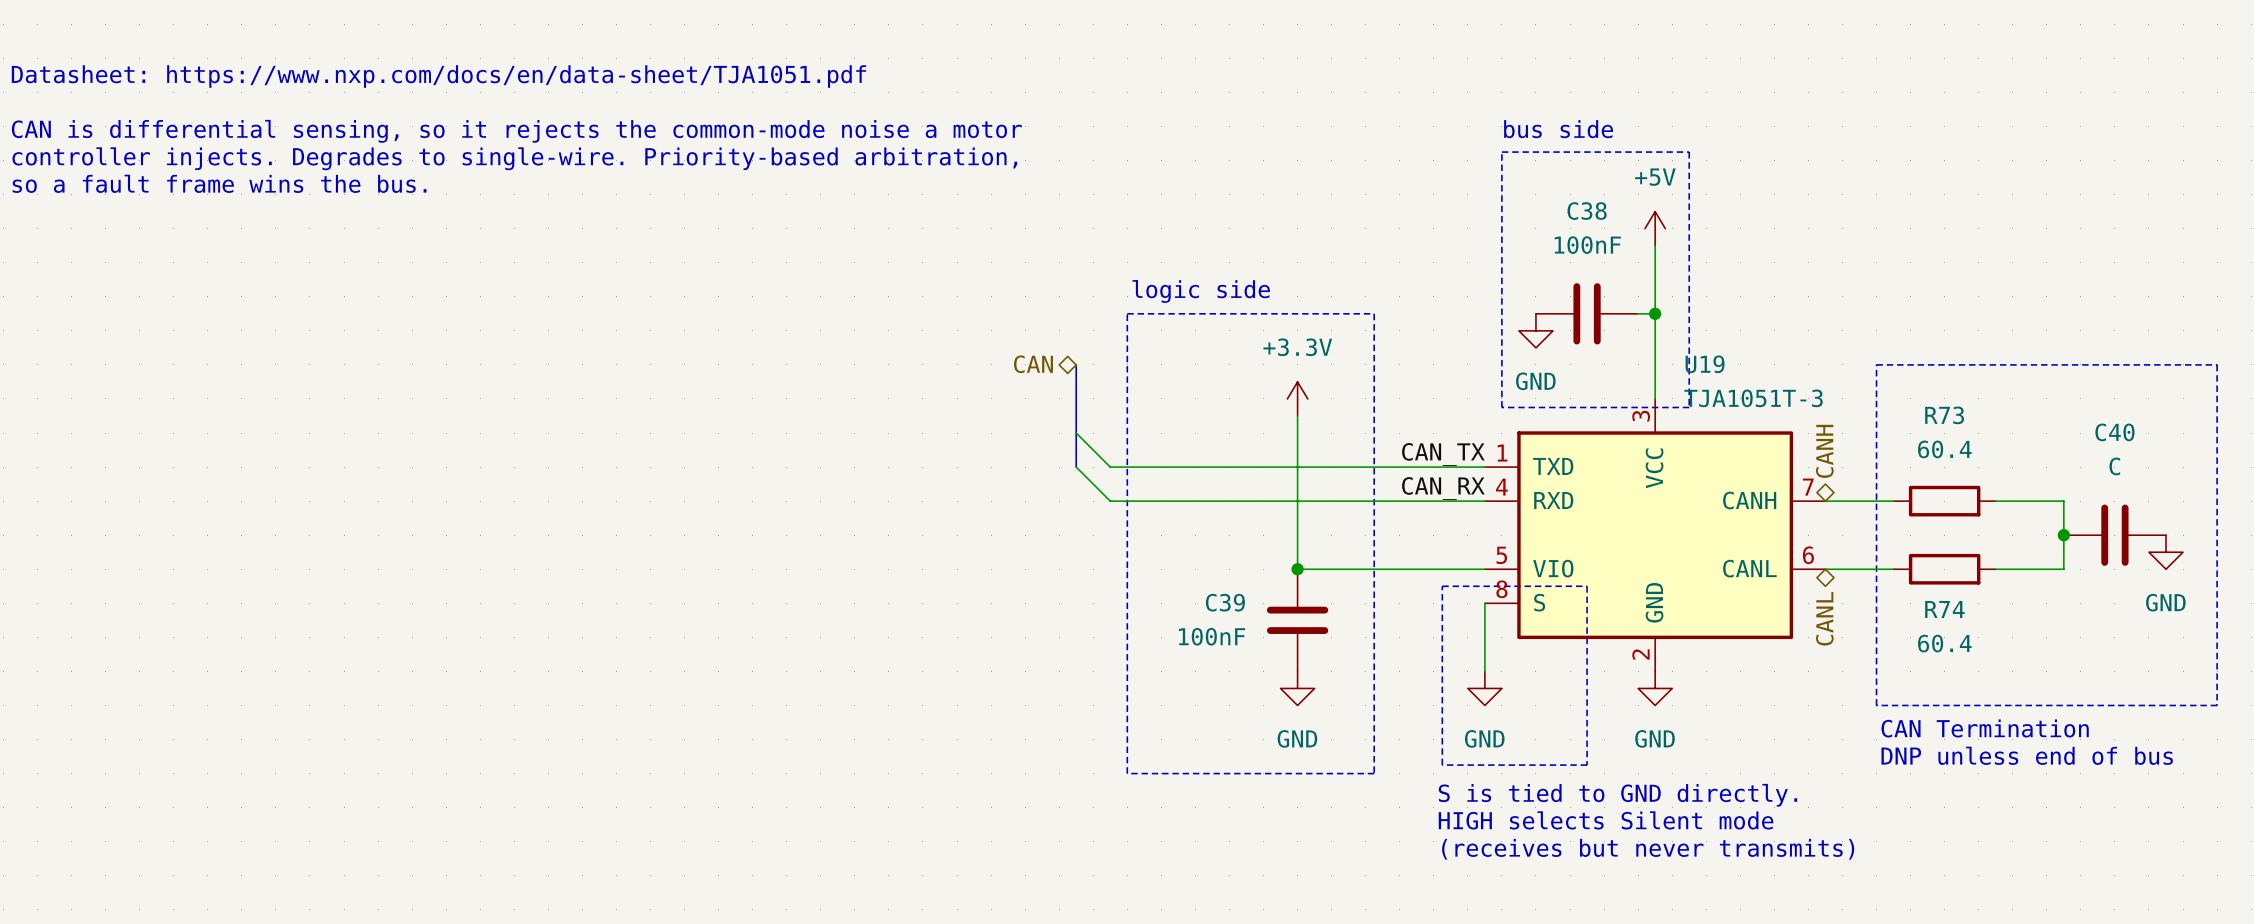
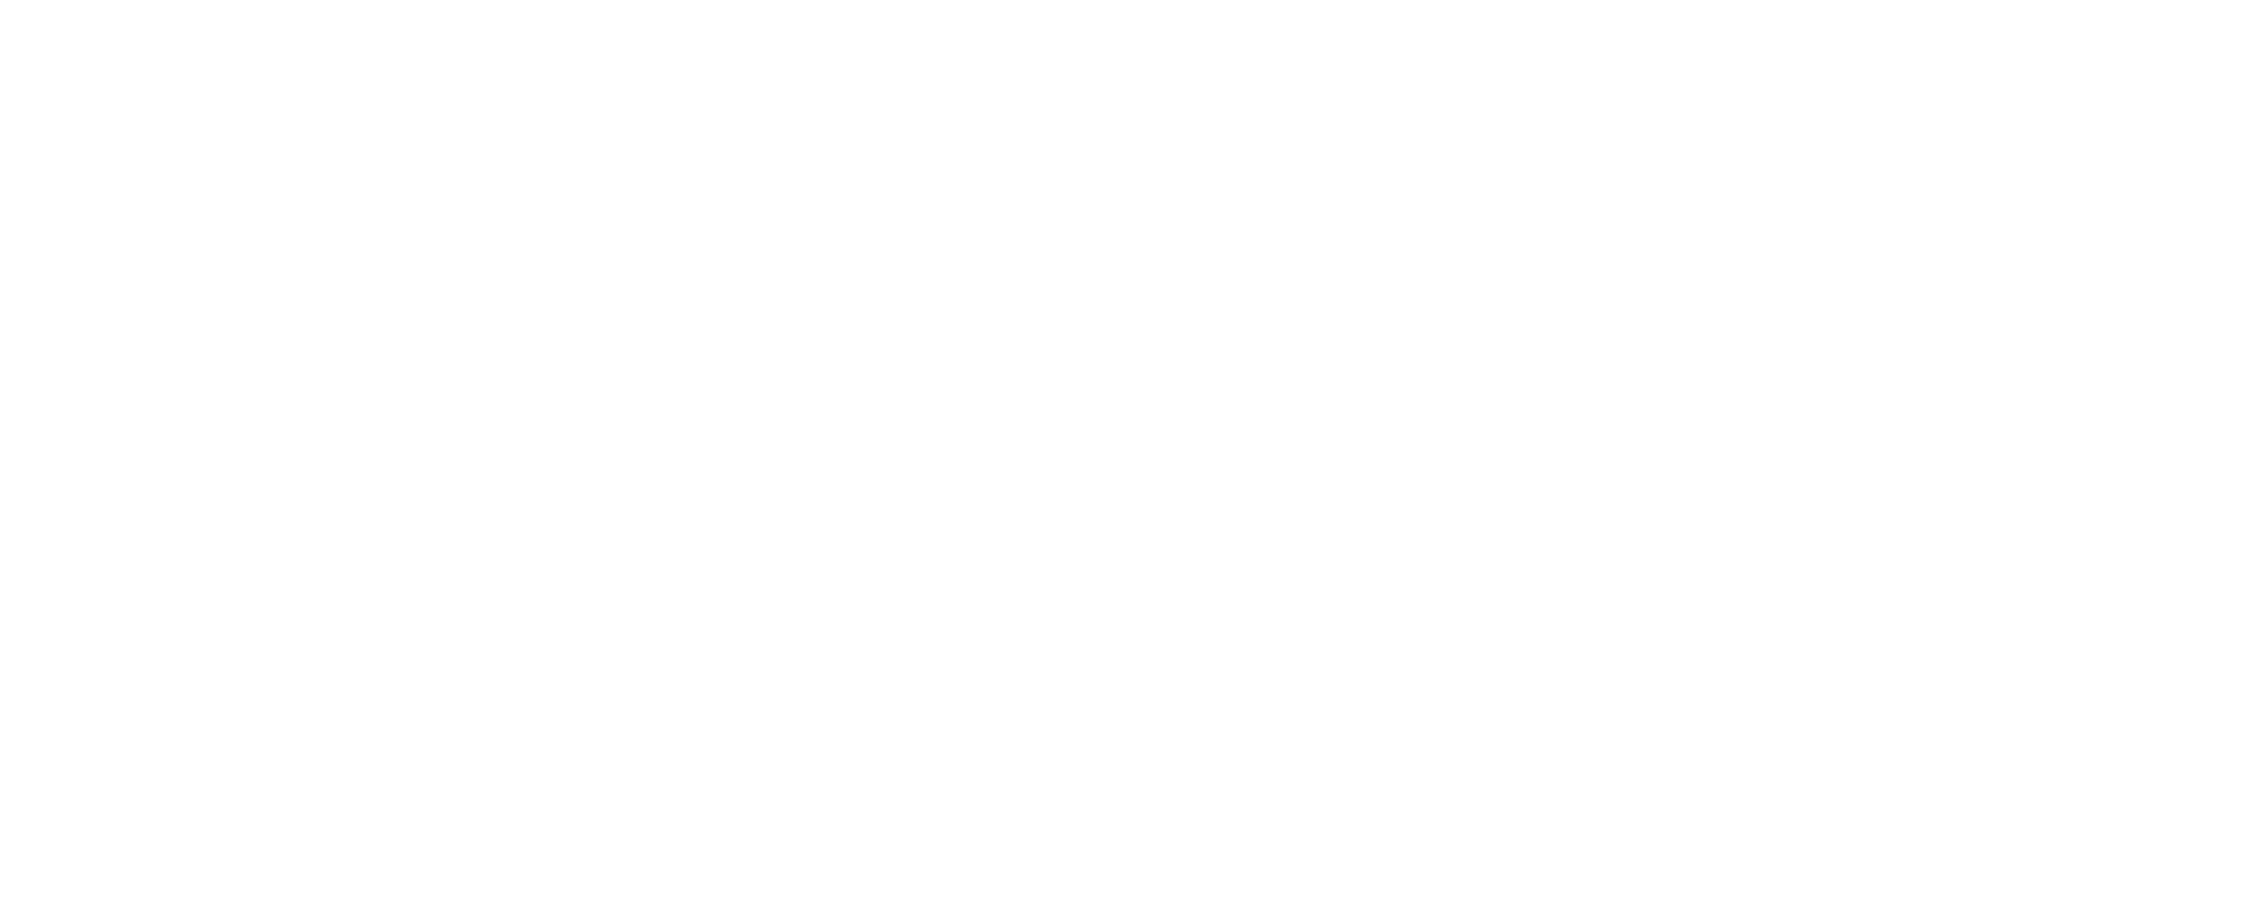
text: Datasheet: https://www.nxp.com/docs/en/data-sheet/TJA1051.pdf (438, 76) -> none
text: bus side (1558, 129) -> none
text: CAN is differential sensing, so it rejects the common-mode noise a motor (516, 131) -> none
line: (1501, 152) (1689, 152) (1689, 407) (1501, 407) (1501, 152) -> none
text: controller injects. Degrades to single-wire. Priority-based arbitration, (514, 158) -> none
text: so a fault frame wins the bus. (219, 183) -> none
power symbol: +5V (1655, 228) -> none
wire: (1655, 245) (1655, 398) -> none
text: logic side (1201, 291) -> none
line: (1127, 313) (1374, 313) (1374, 773) (1127, 773) (1127, 313) -> none
C38: 100nF (1587, 313) -> none
wire: (1638, 313) (1655, 313) -> none
junction: (1655, 313) -> none
power symbol: GND (1535, 330) -> none
hierarchical label: CAN (1033, 364) -> none
bus: (1076, 364) (1076, 467) -> none
line: (1876, 364) (2217, 364) (2217, 705) (1876, 705) (1876, 364) -> none
power symbol: +3.3V (1297, 398) -> none
wire: (1297, 416) (1297, 569) (1484, 569) -> none
wire: (1076, 433) (1110, 467) (1484, 467) -> none
hierarchical label: CANH (1824, 451) -> none
label: CAN_TX (1443, 454) -> none
wire: (1076, 467) (1110, 501) (1484, 501) -> none
label: CAN_RX (1443, 488) -> none
wire: (1825, 501) (1893, 501) -> none
R73: 60.4 (1944, 501) -> none
wire: (1995, 501) (2063, 501) (2063, 569) (1995, 569) -> none
U19: TJA1051T-3 (1655, 535) -> none
junction: (2063, 535) -> none
C40: C (2114, 535) -> none
power symbol: GND (2166, 552) -> none
junction: (1297, 569) -> none
wire: (1825, 569) (1893, 569) -> none
R74: 60.4 (1944, 569) -> none
line: (1442, 586) (1587, 586) (1587, 765) (1442, 765) (1442, 586) -> none
wire: (1484, 603) (1484, 671) -> none
hierarchical label: CANL (1824, 618) -> none
C39: 100nF (1297, 620) -> none
power symbol: GND (1297, 688) -> none
power symbol: GND (1484, 688) -> none
power symbol: GND (1655, 688) -> none
text: CAN Termination (1985, 728) -> none
text: DNP unless end of bus (2027, 755) -> none
text: S is tied to GND directly. (1617, 795) -> none
text: HIGH selects Silent mode (1606, 820) -> none
text: (receives but never transmits) (1648, 849) -> none

